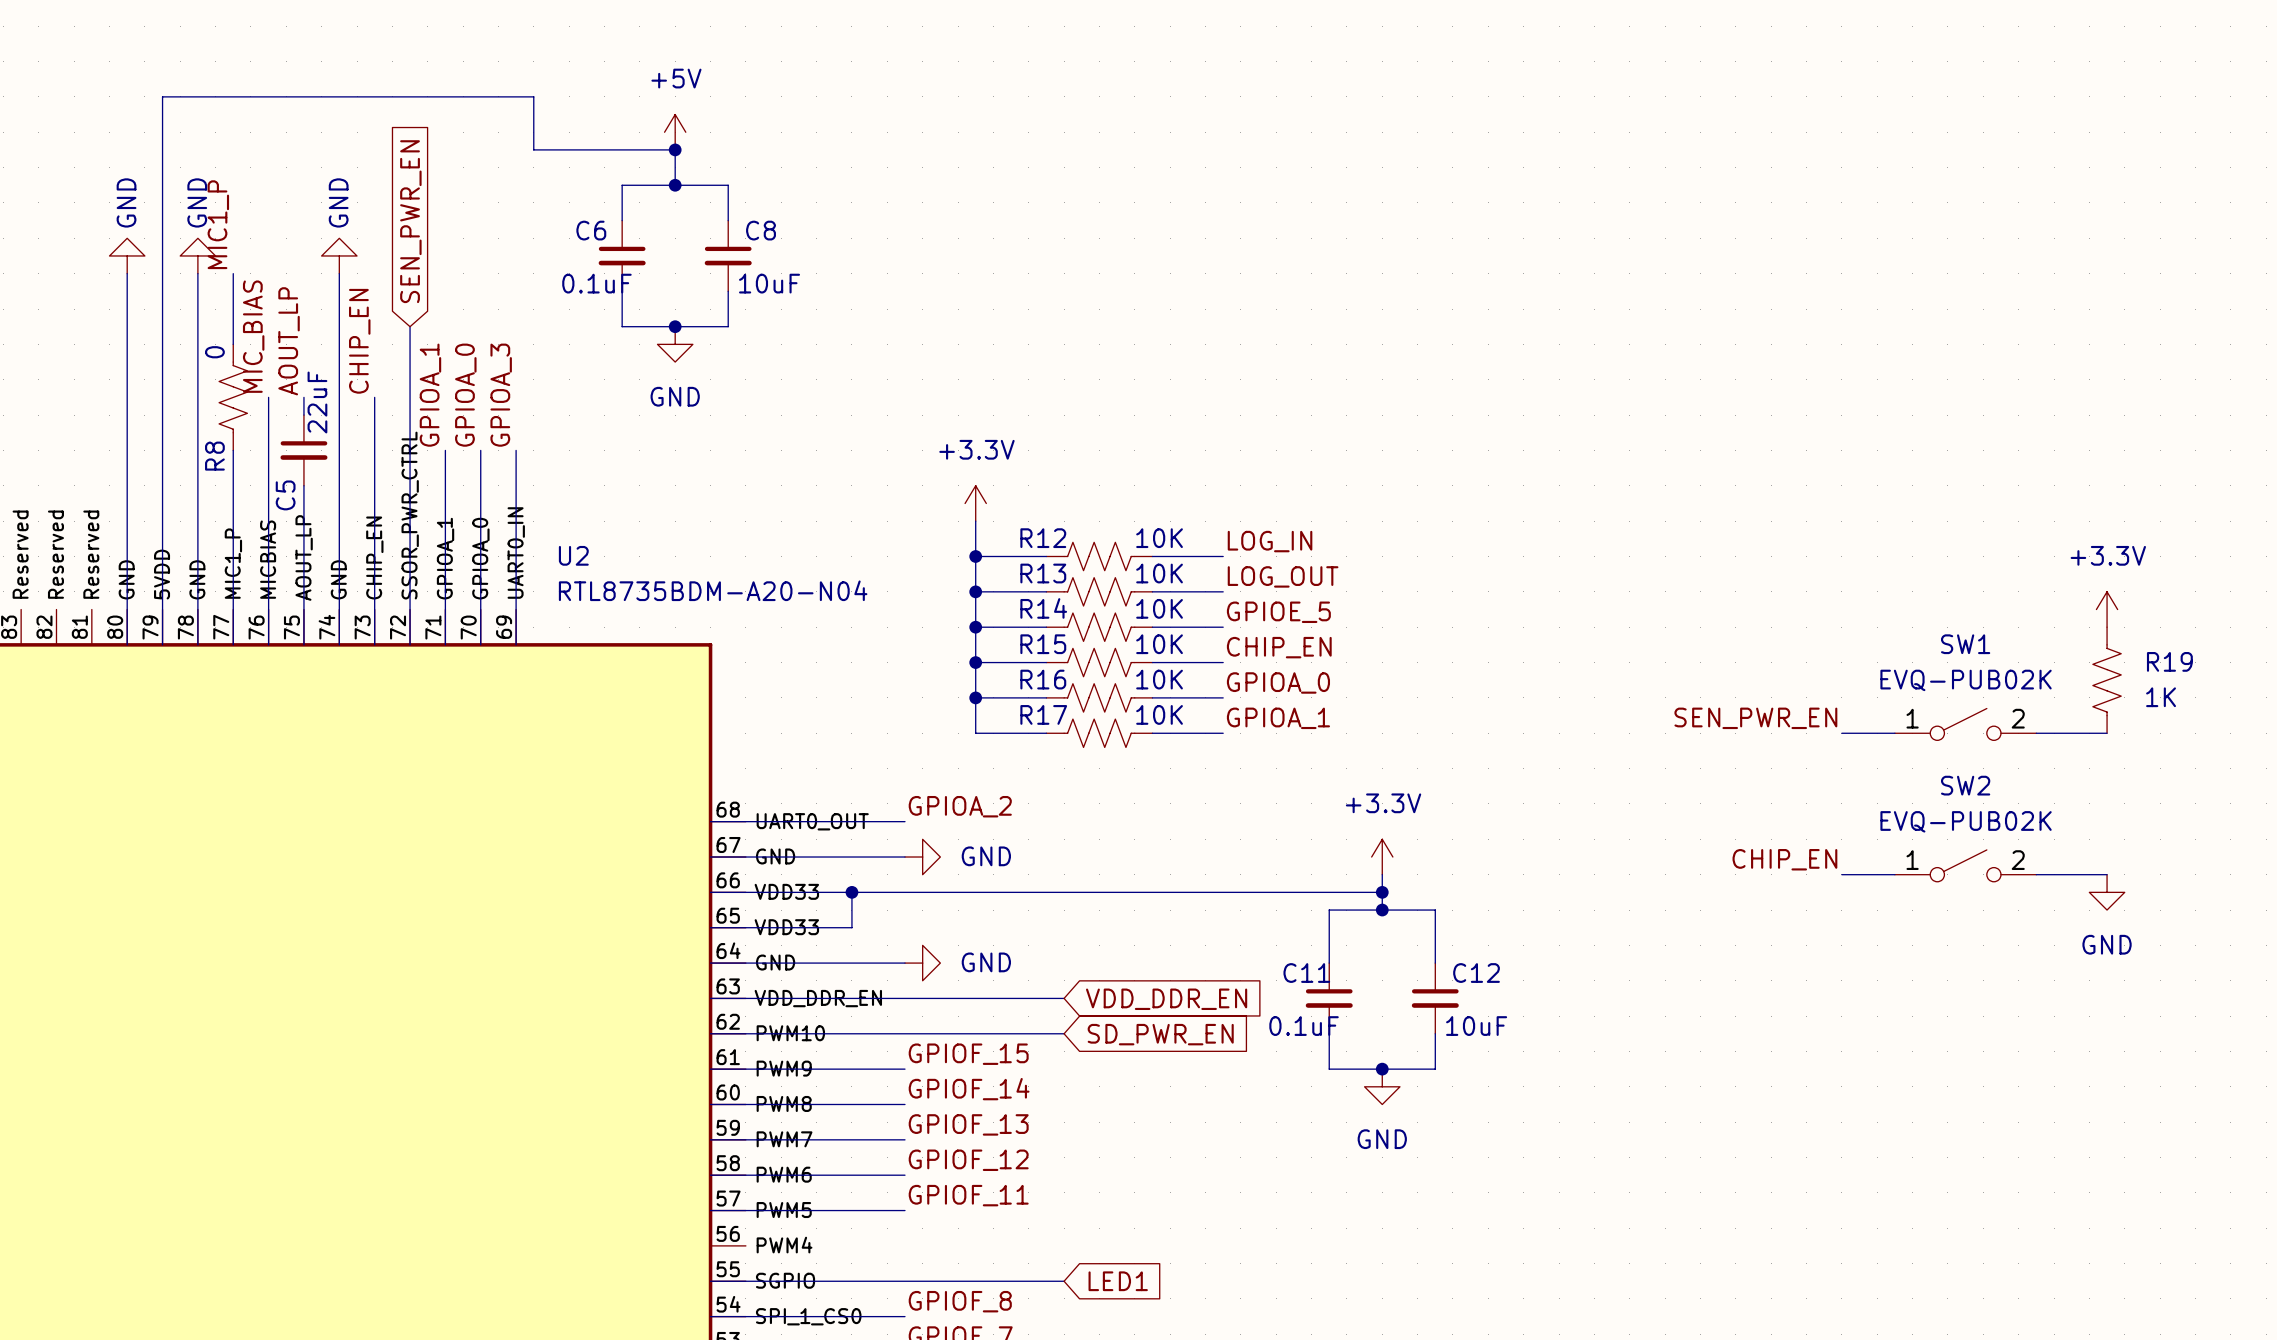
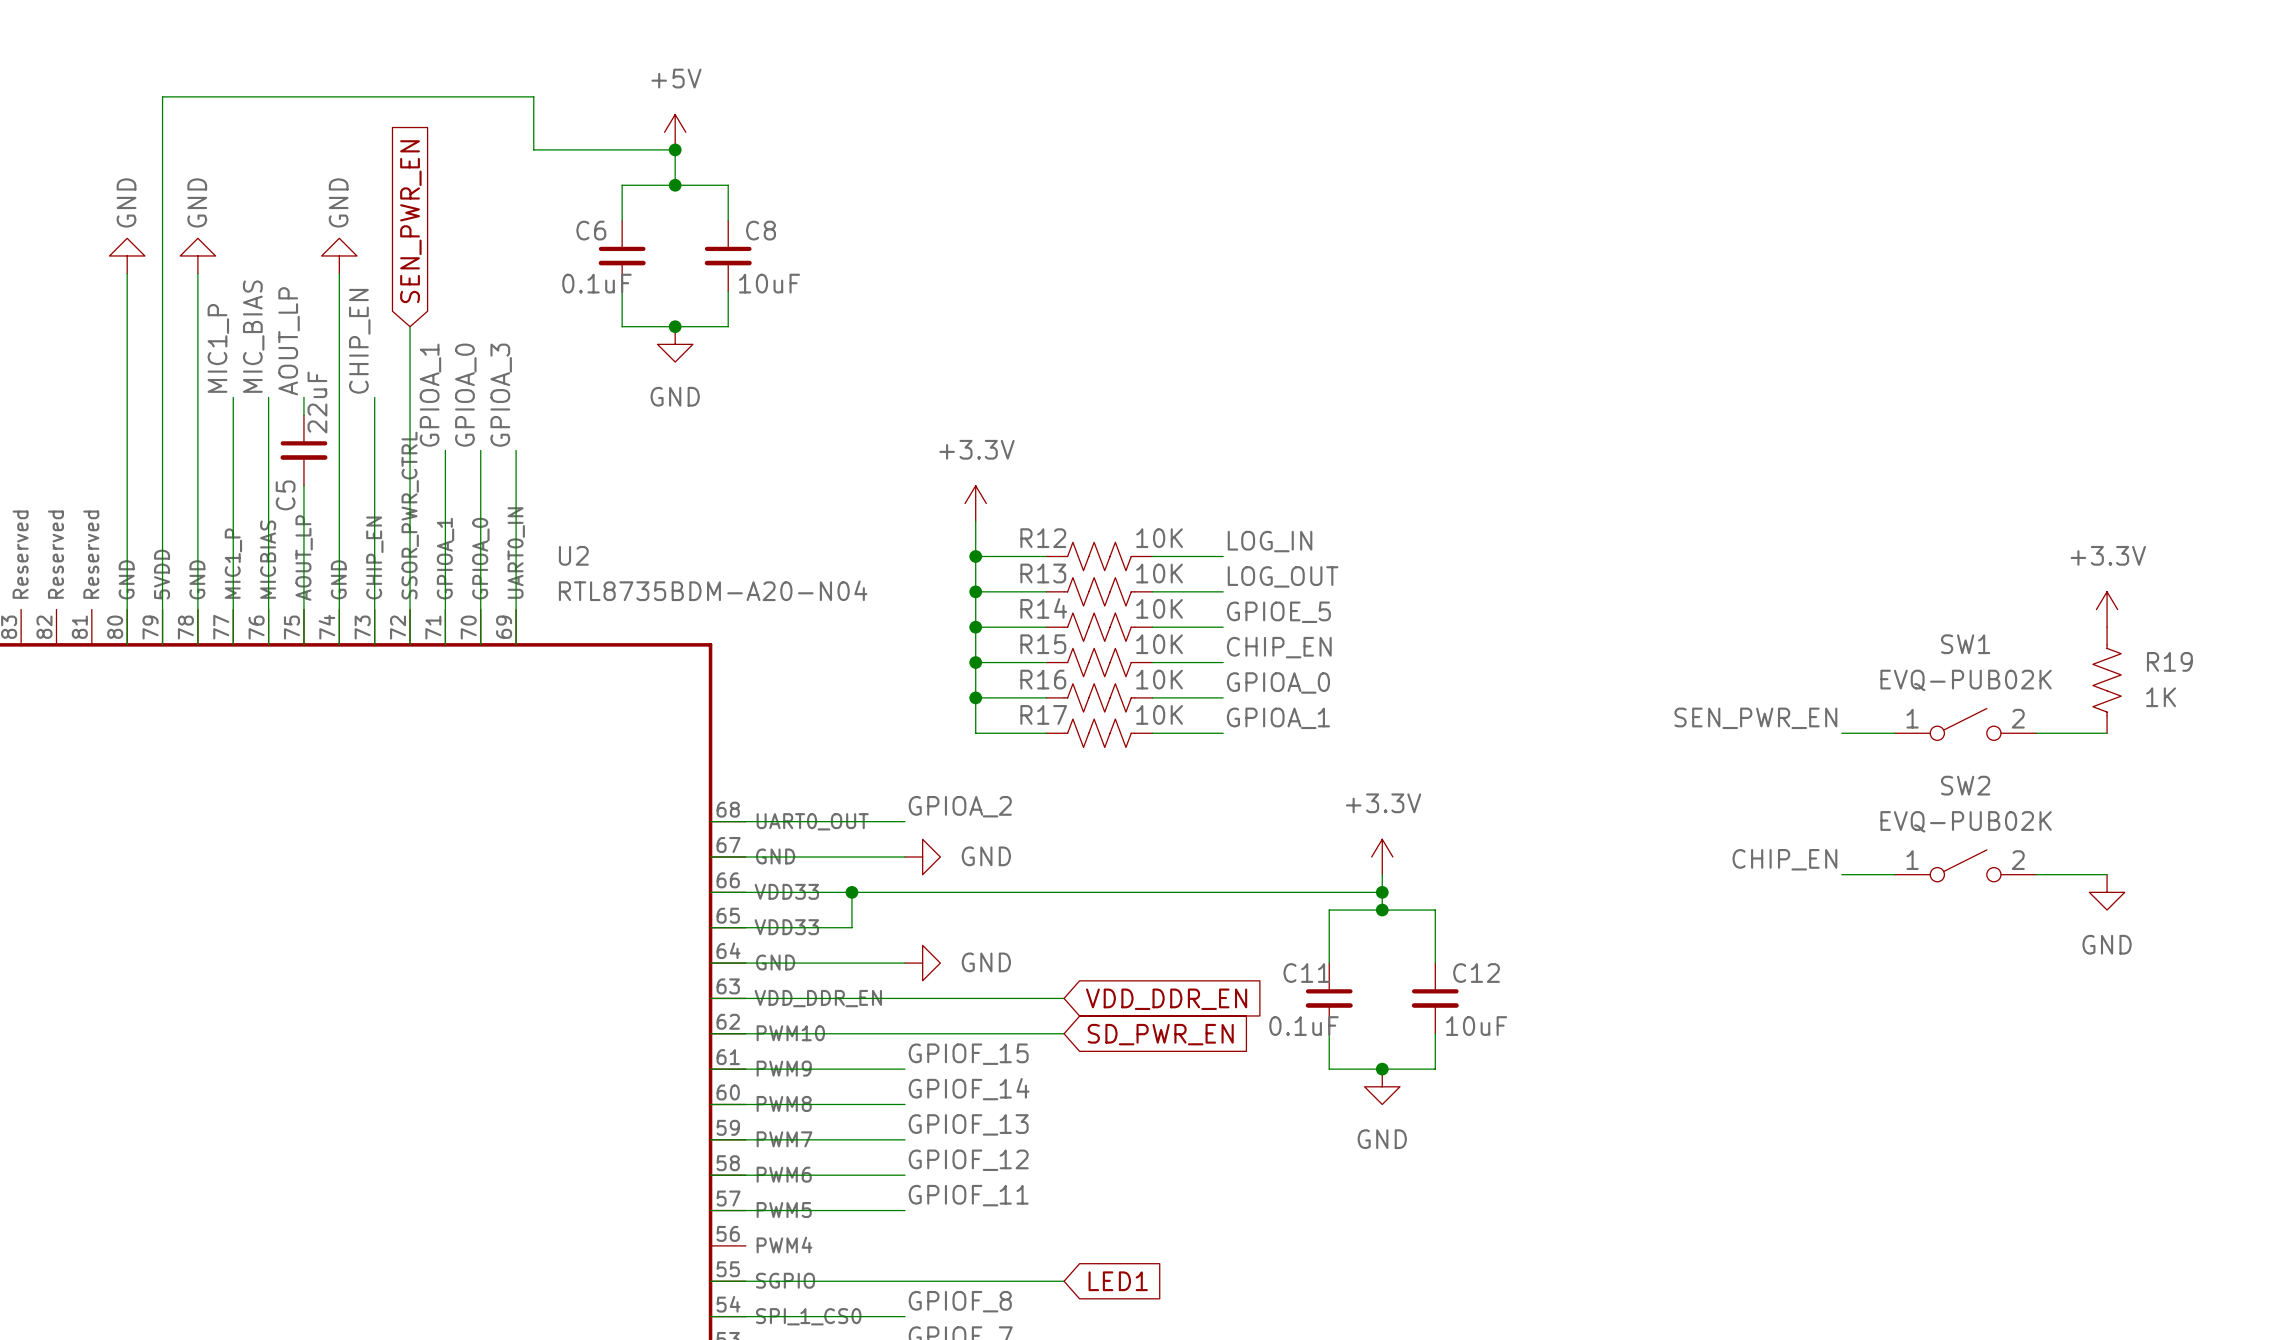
label position: MIC1_P (218, 224) -> MIC1_P (218, 348)
wire: (233, 273) (233, 344) -> none
wire: none -> (233, 397) (233, 450)
R8: 0 (233, 397) -> none

